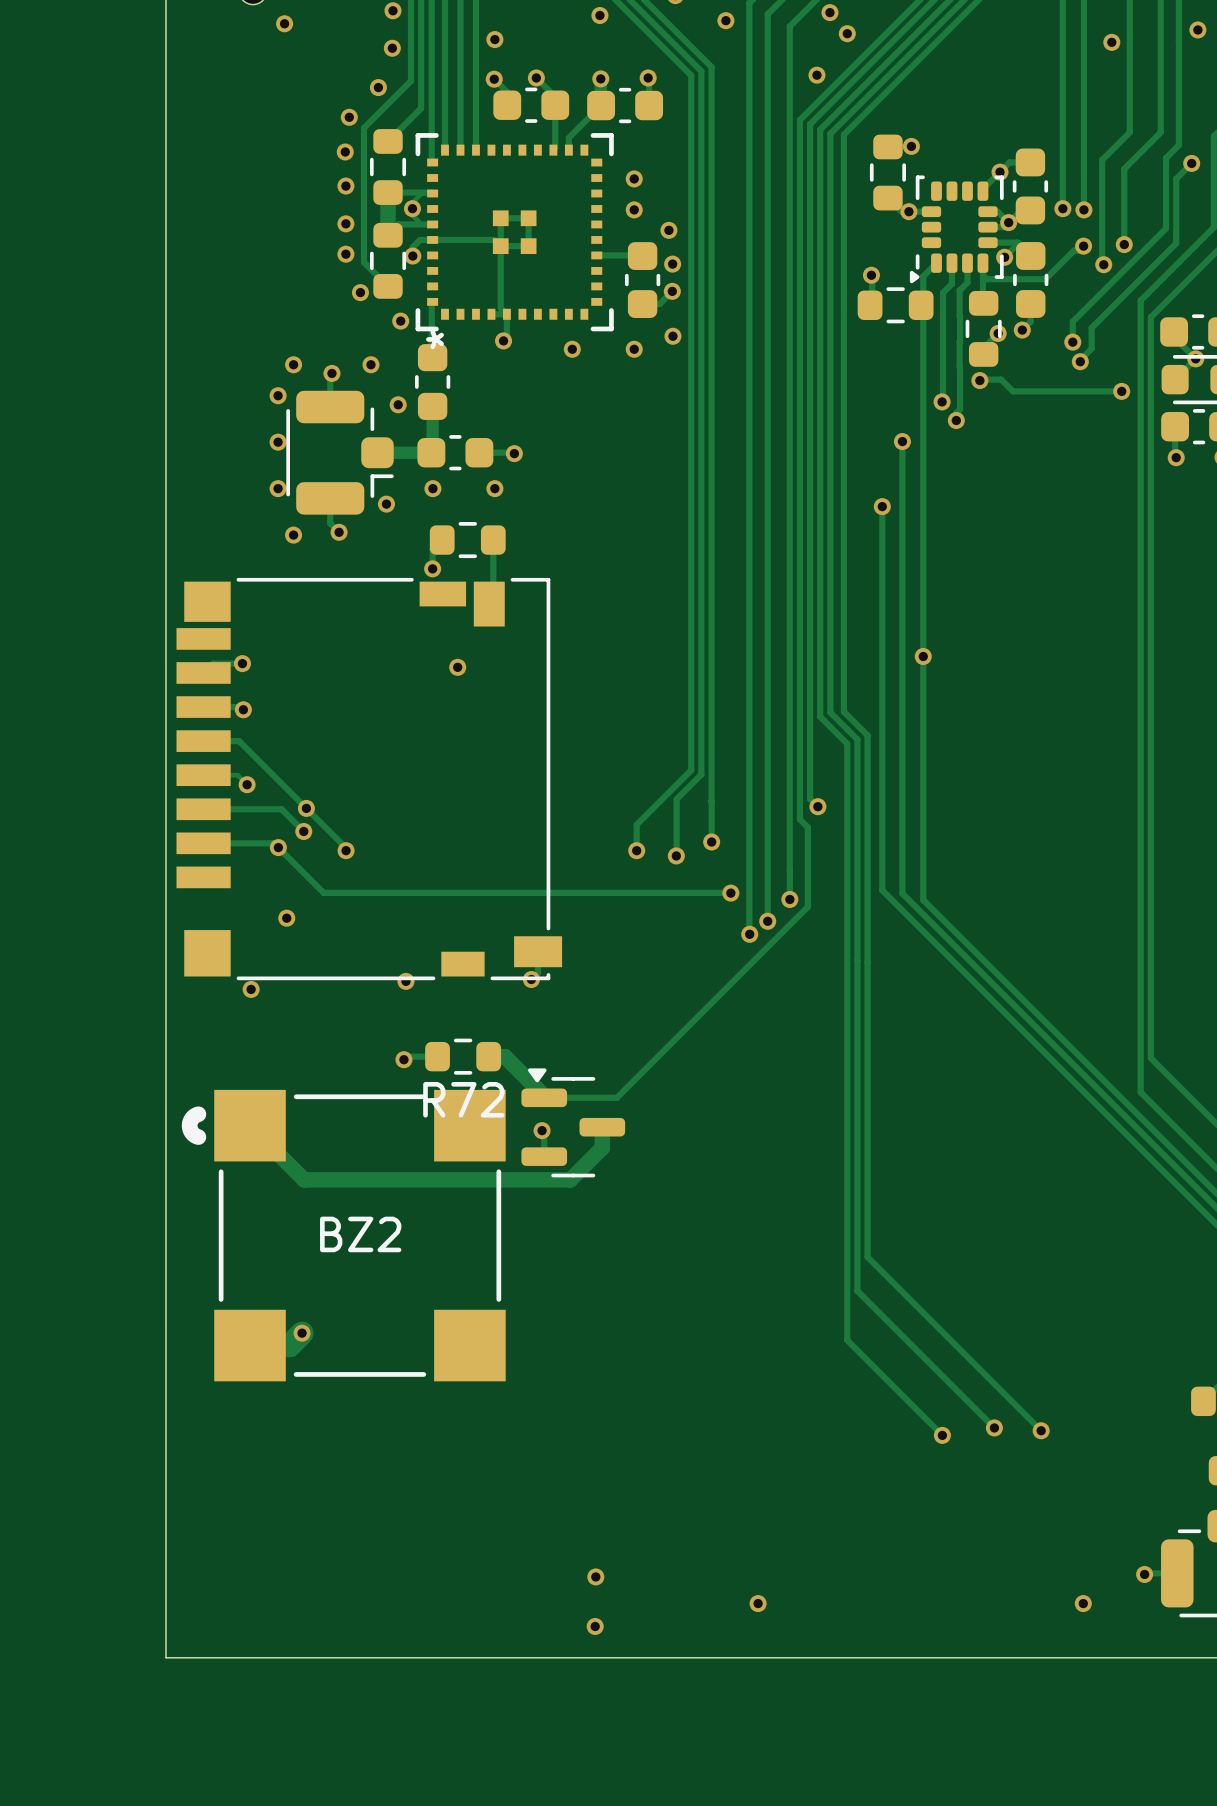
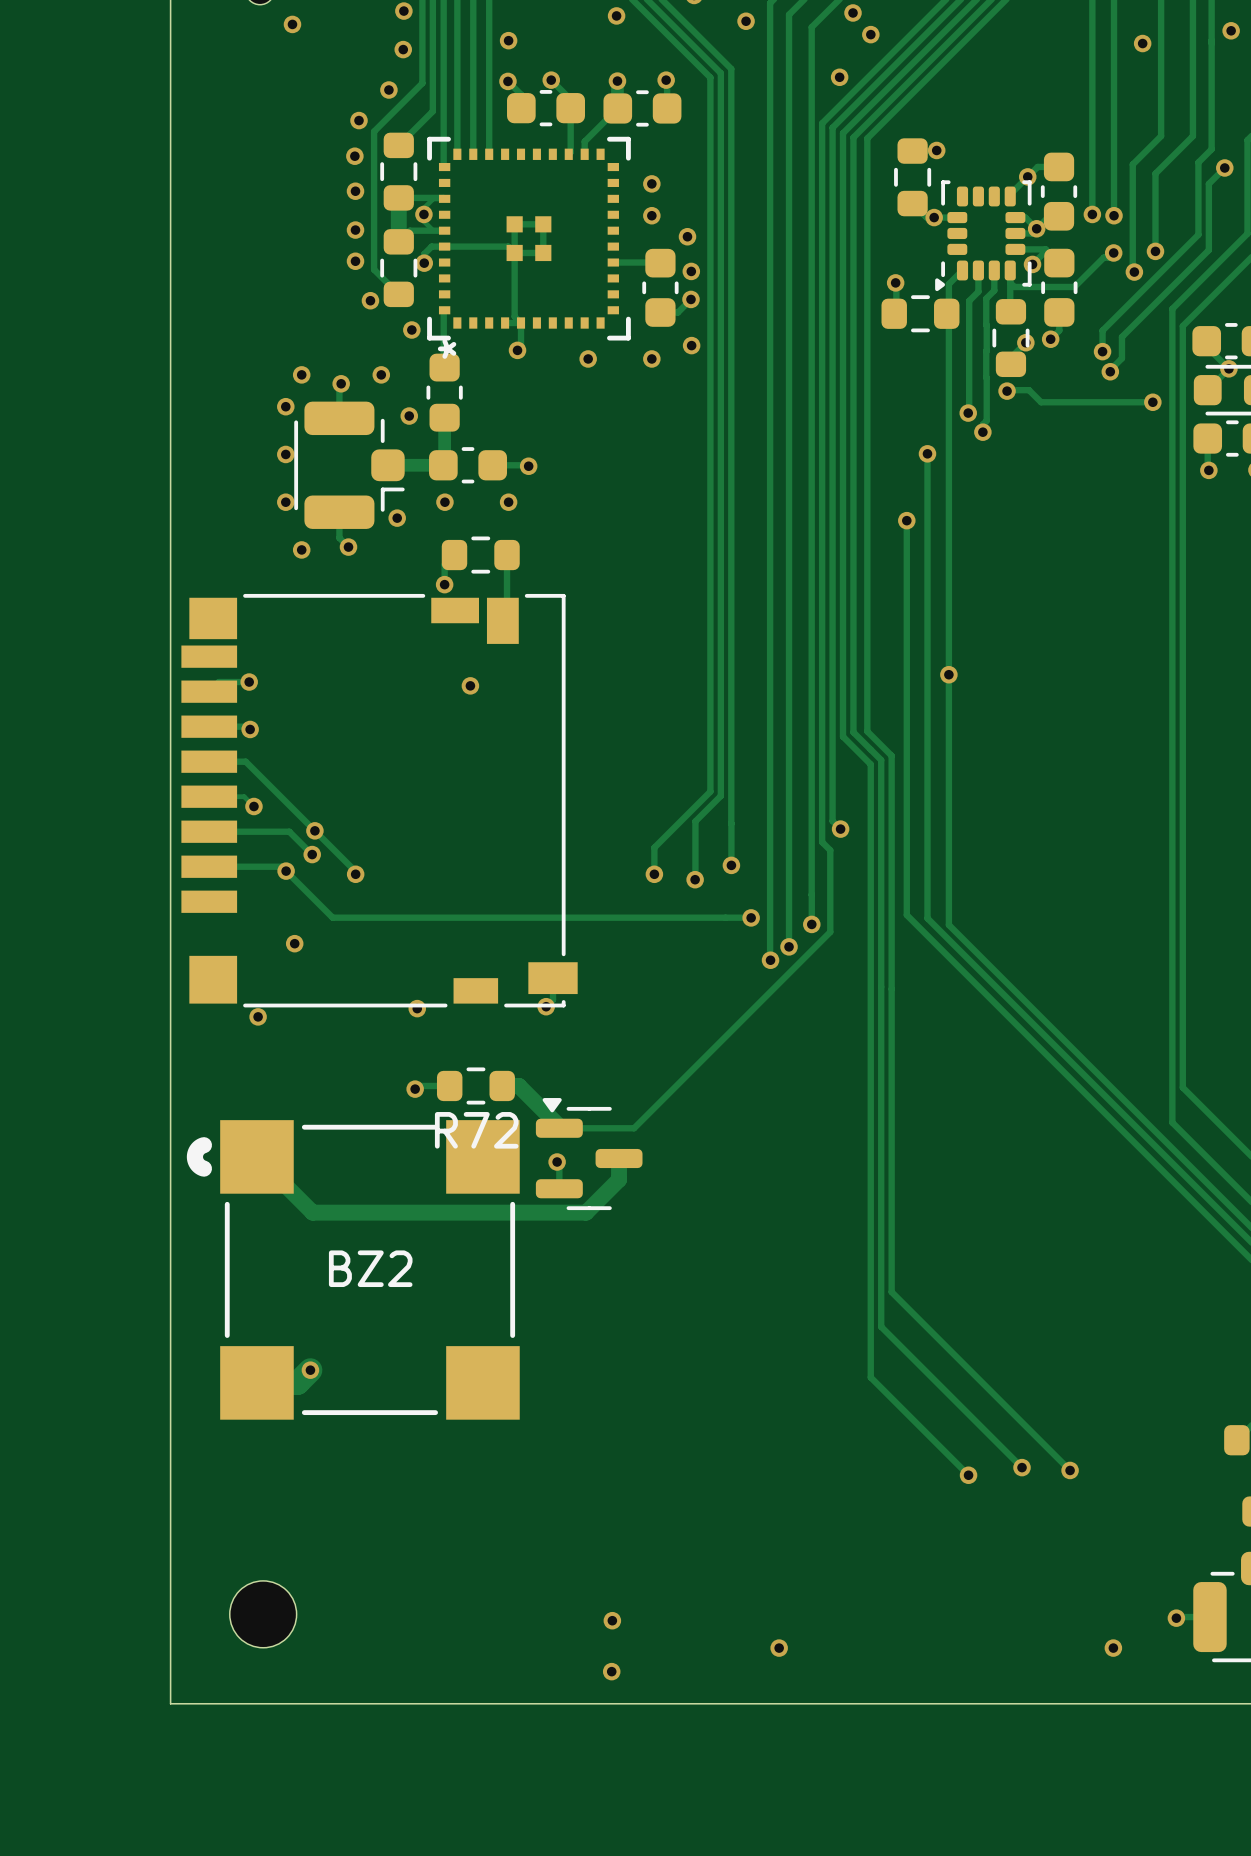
part: none -> (263, 1614)

